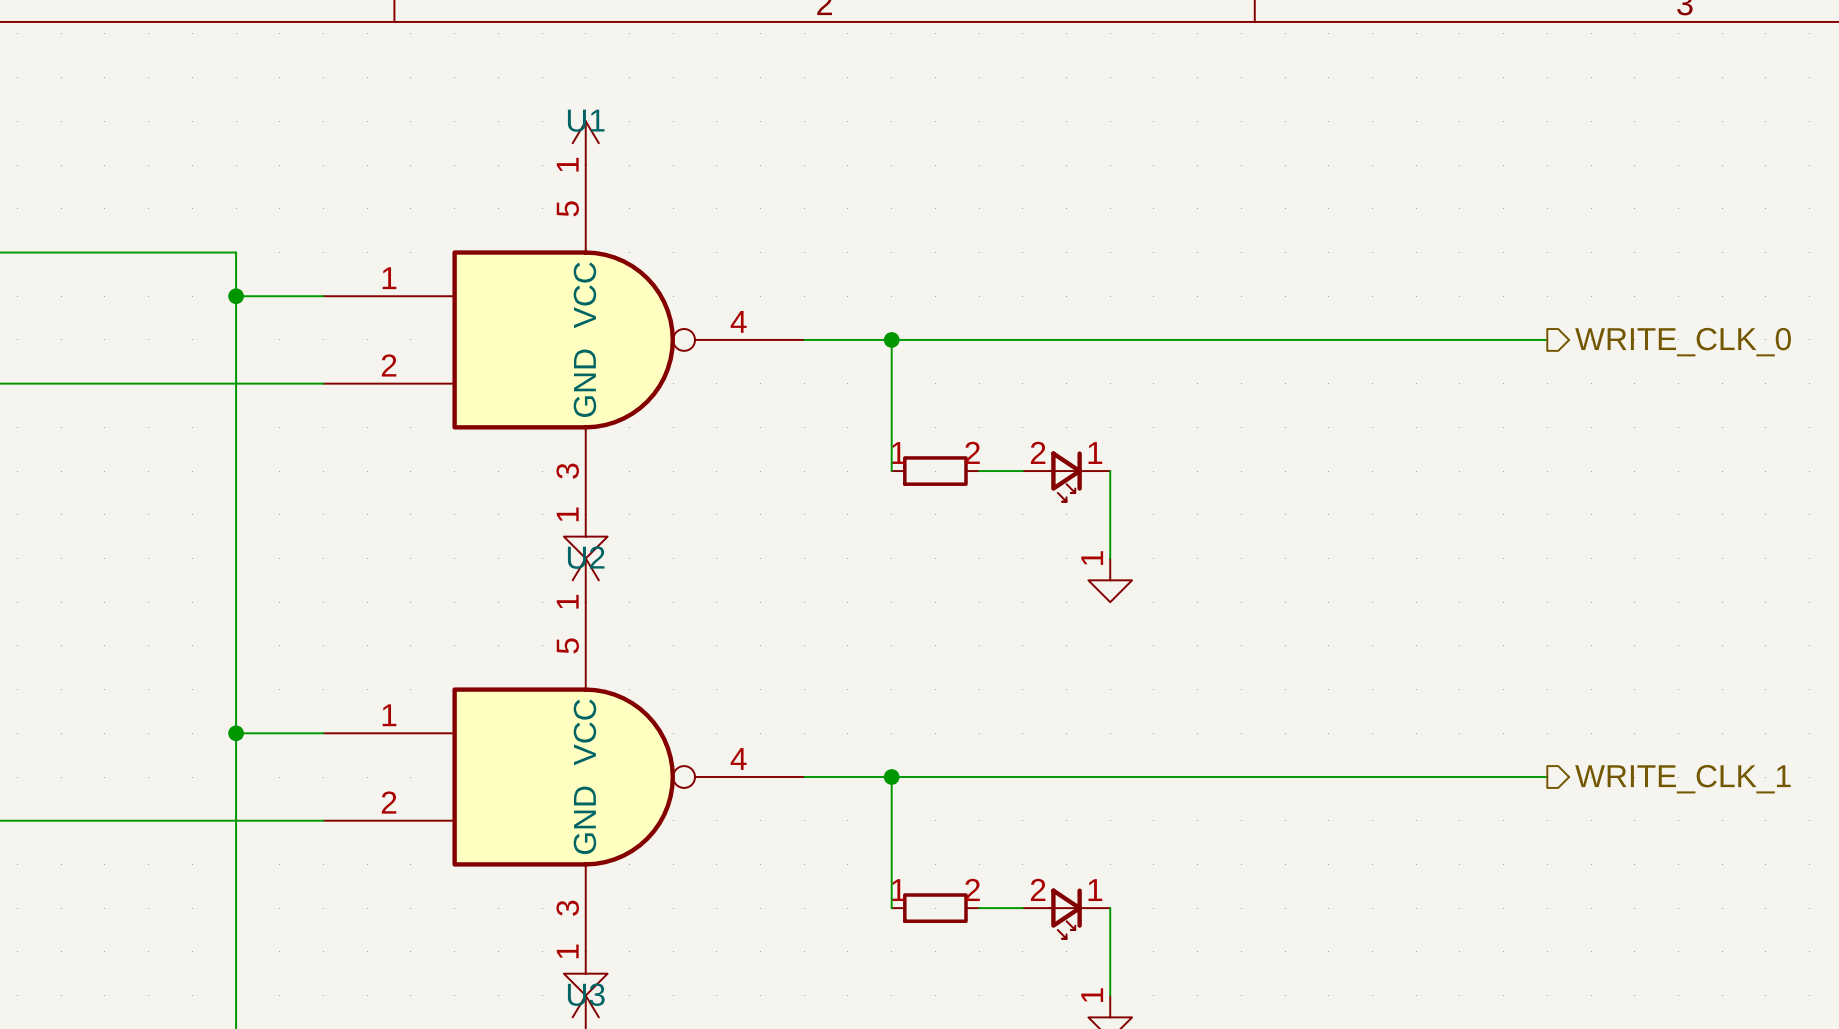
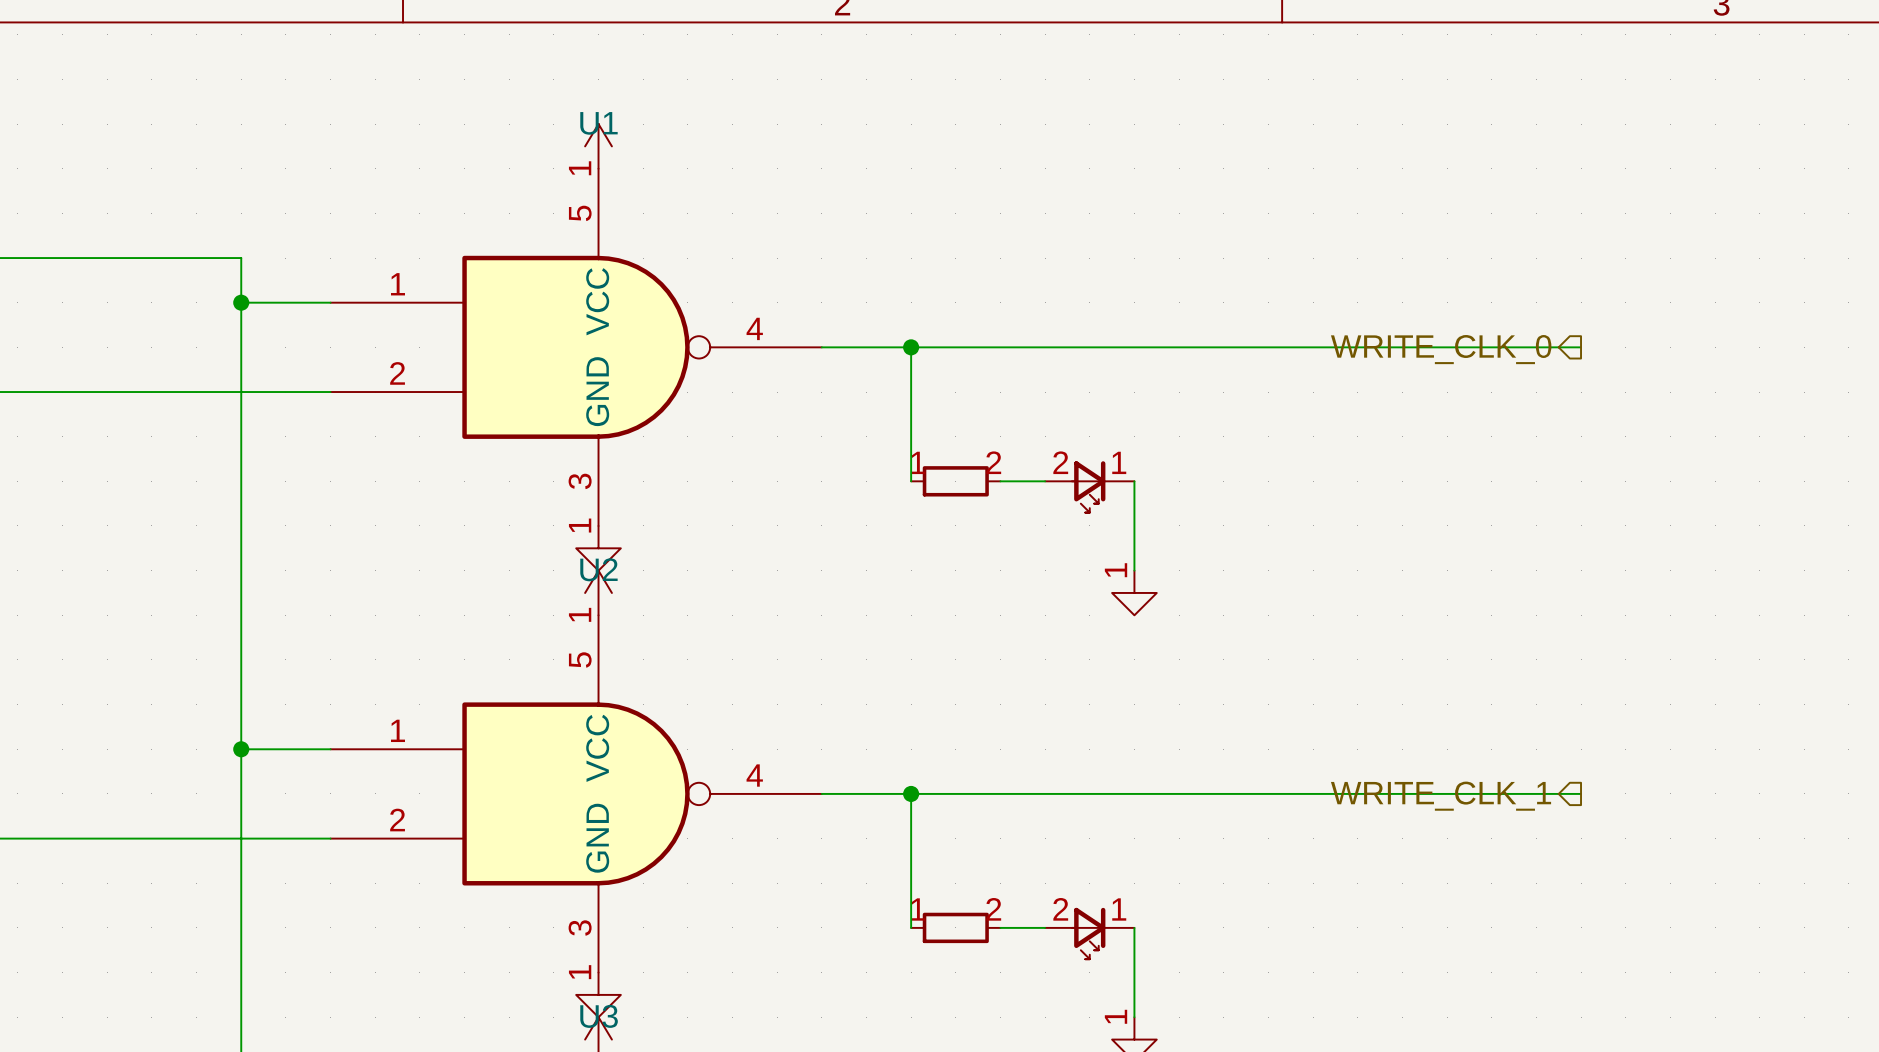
hierarchical label rotation: 0° (1683, 342) -> 180° (1441, 349)
hierarchical label position: WRITE_CLK_0 (1683, 342) -> WRITE_CLK_0 (1441, 349)
hierarchical label rotation: 0° (1682, 779) -> 180° (1441, 796)
hierarchical label position: WRITE_CLK_1 (1682, 779) -> WRITE_CLK_1 (1441, 796)

